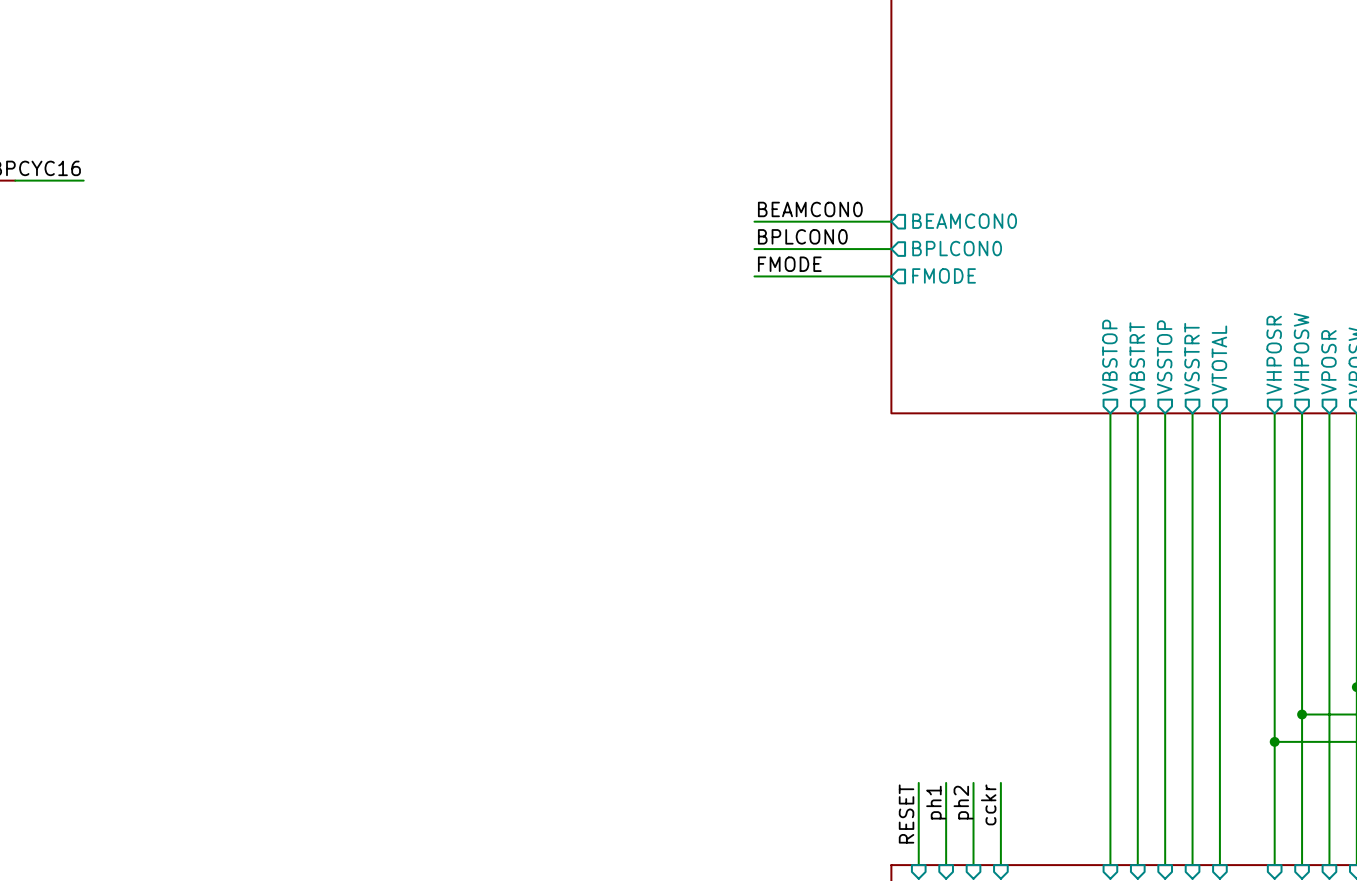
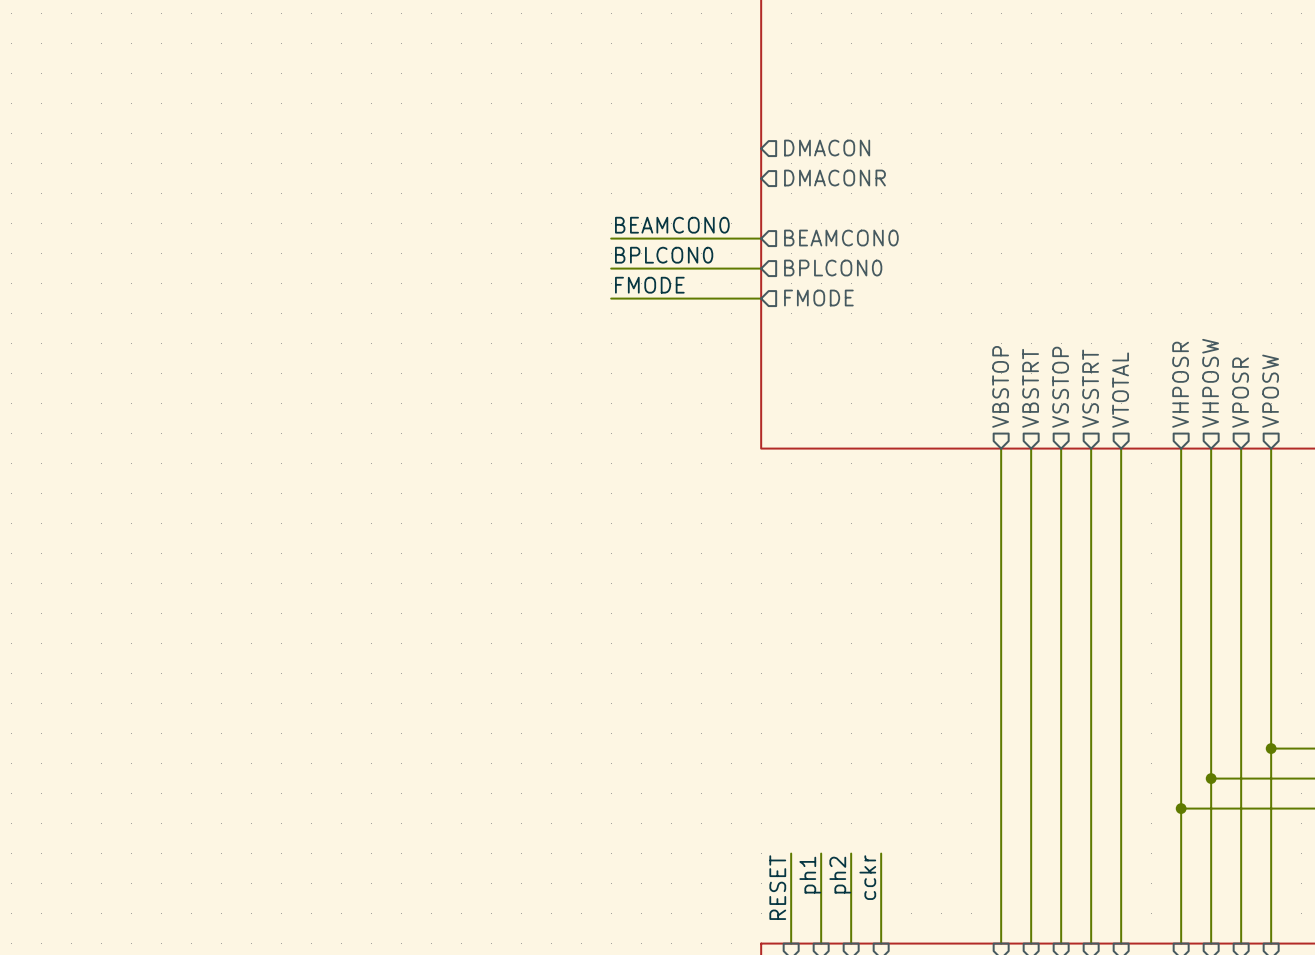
sheet pin: none -> DMACON (827, 148)
sheet pin: none -> DMACONR (834, 178)

